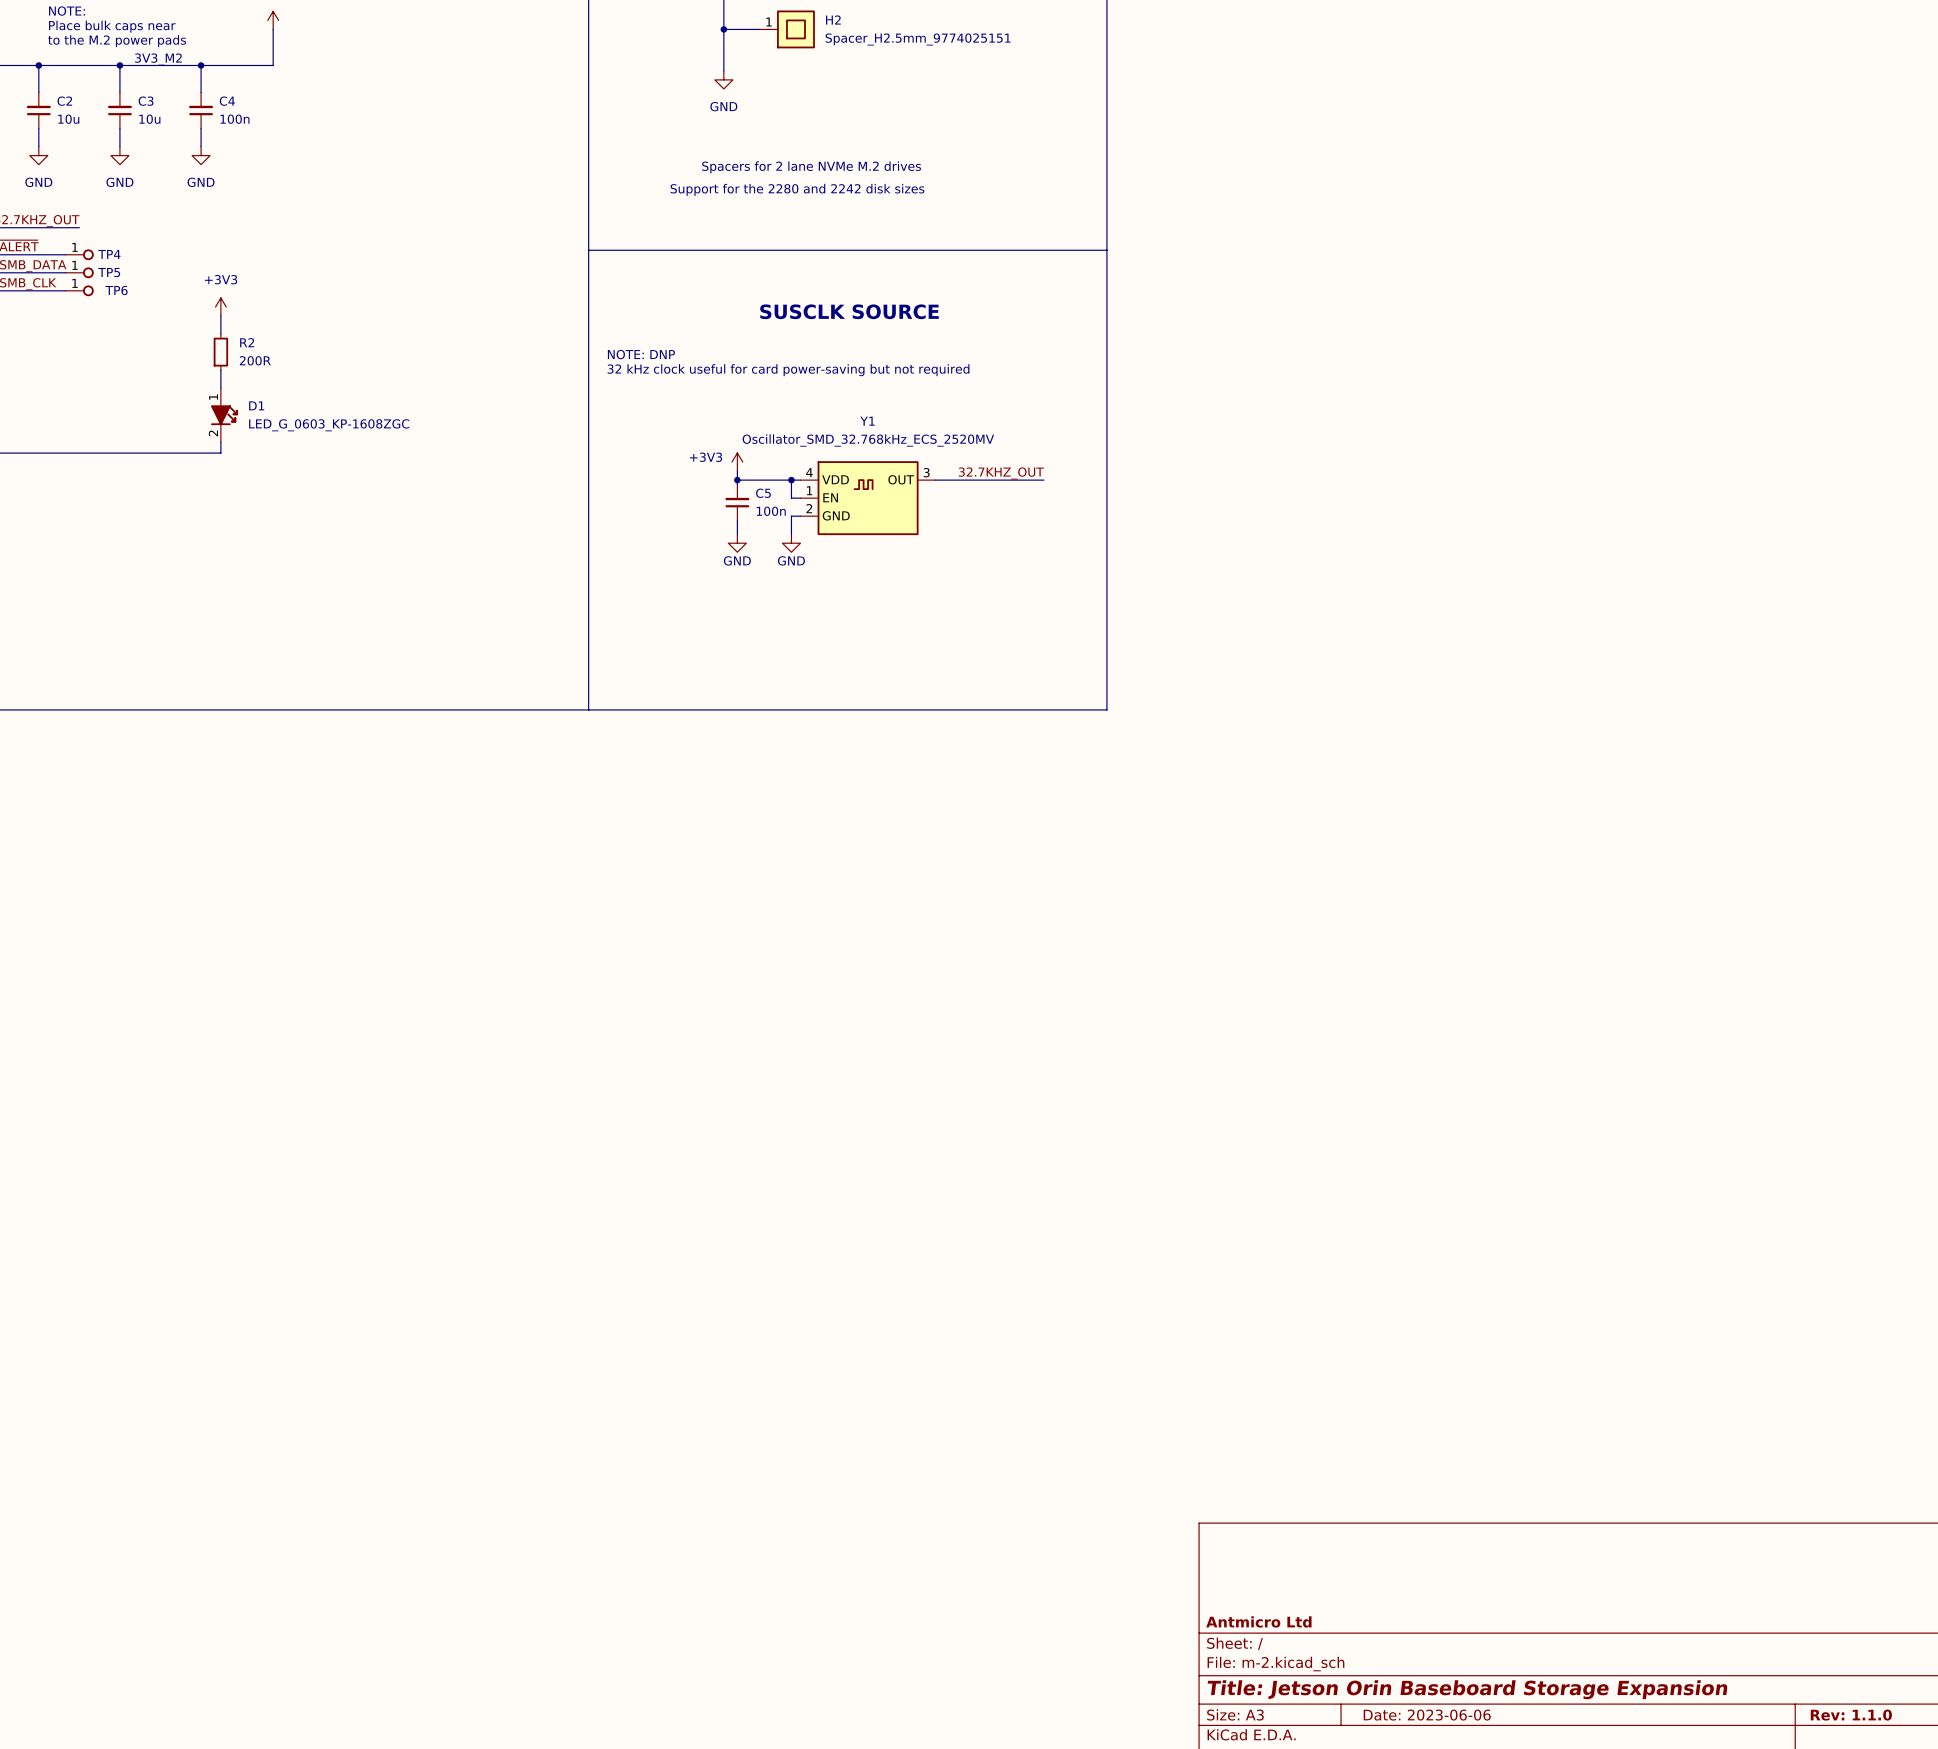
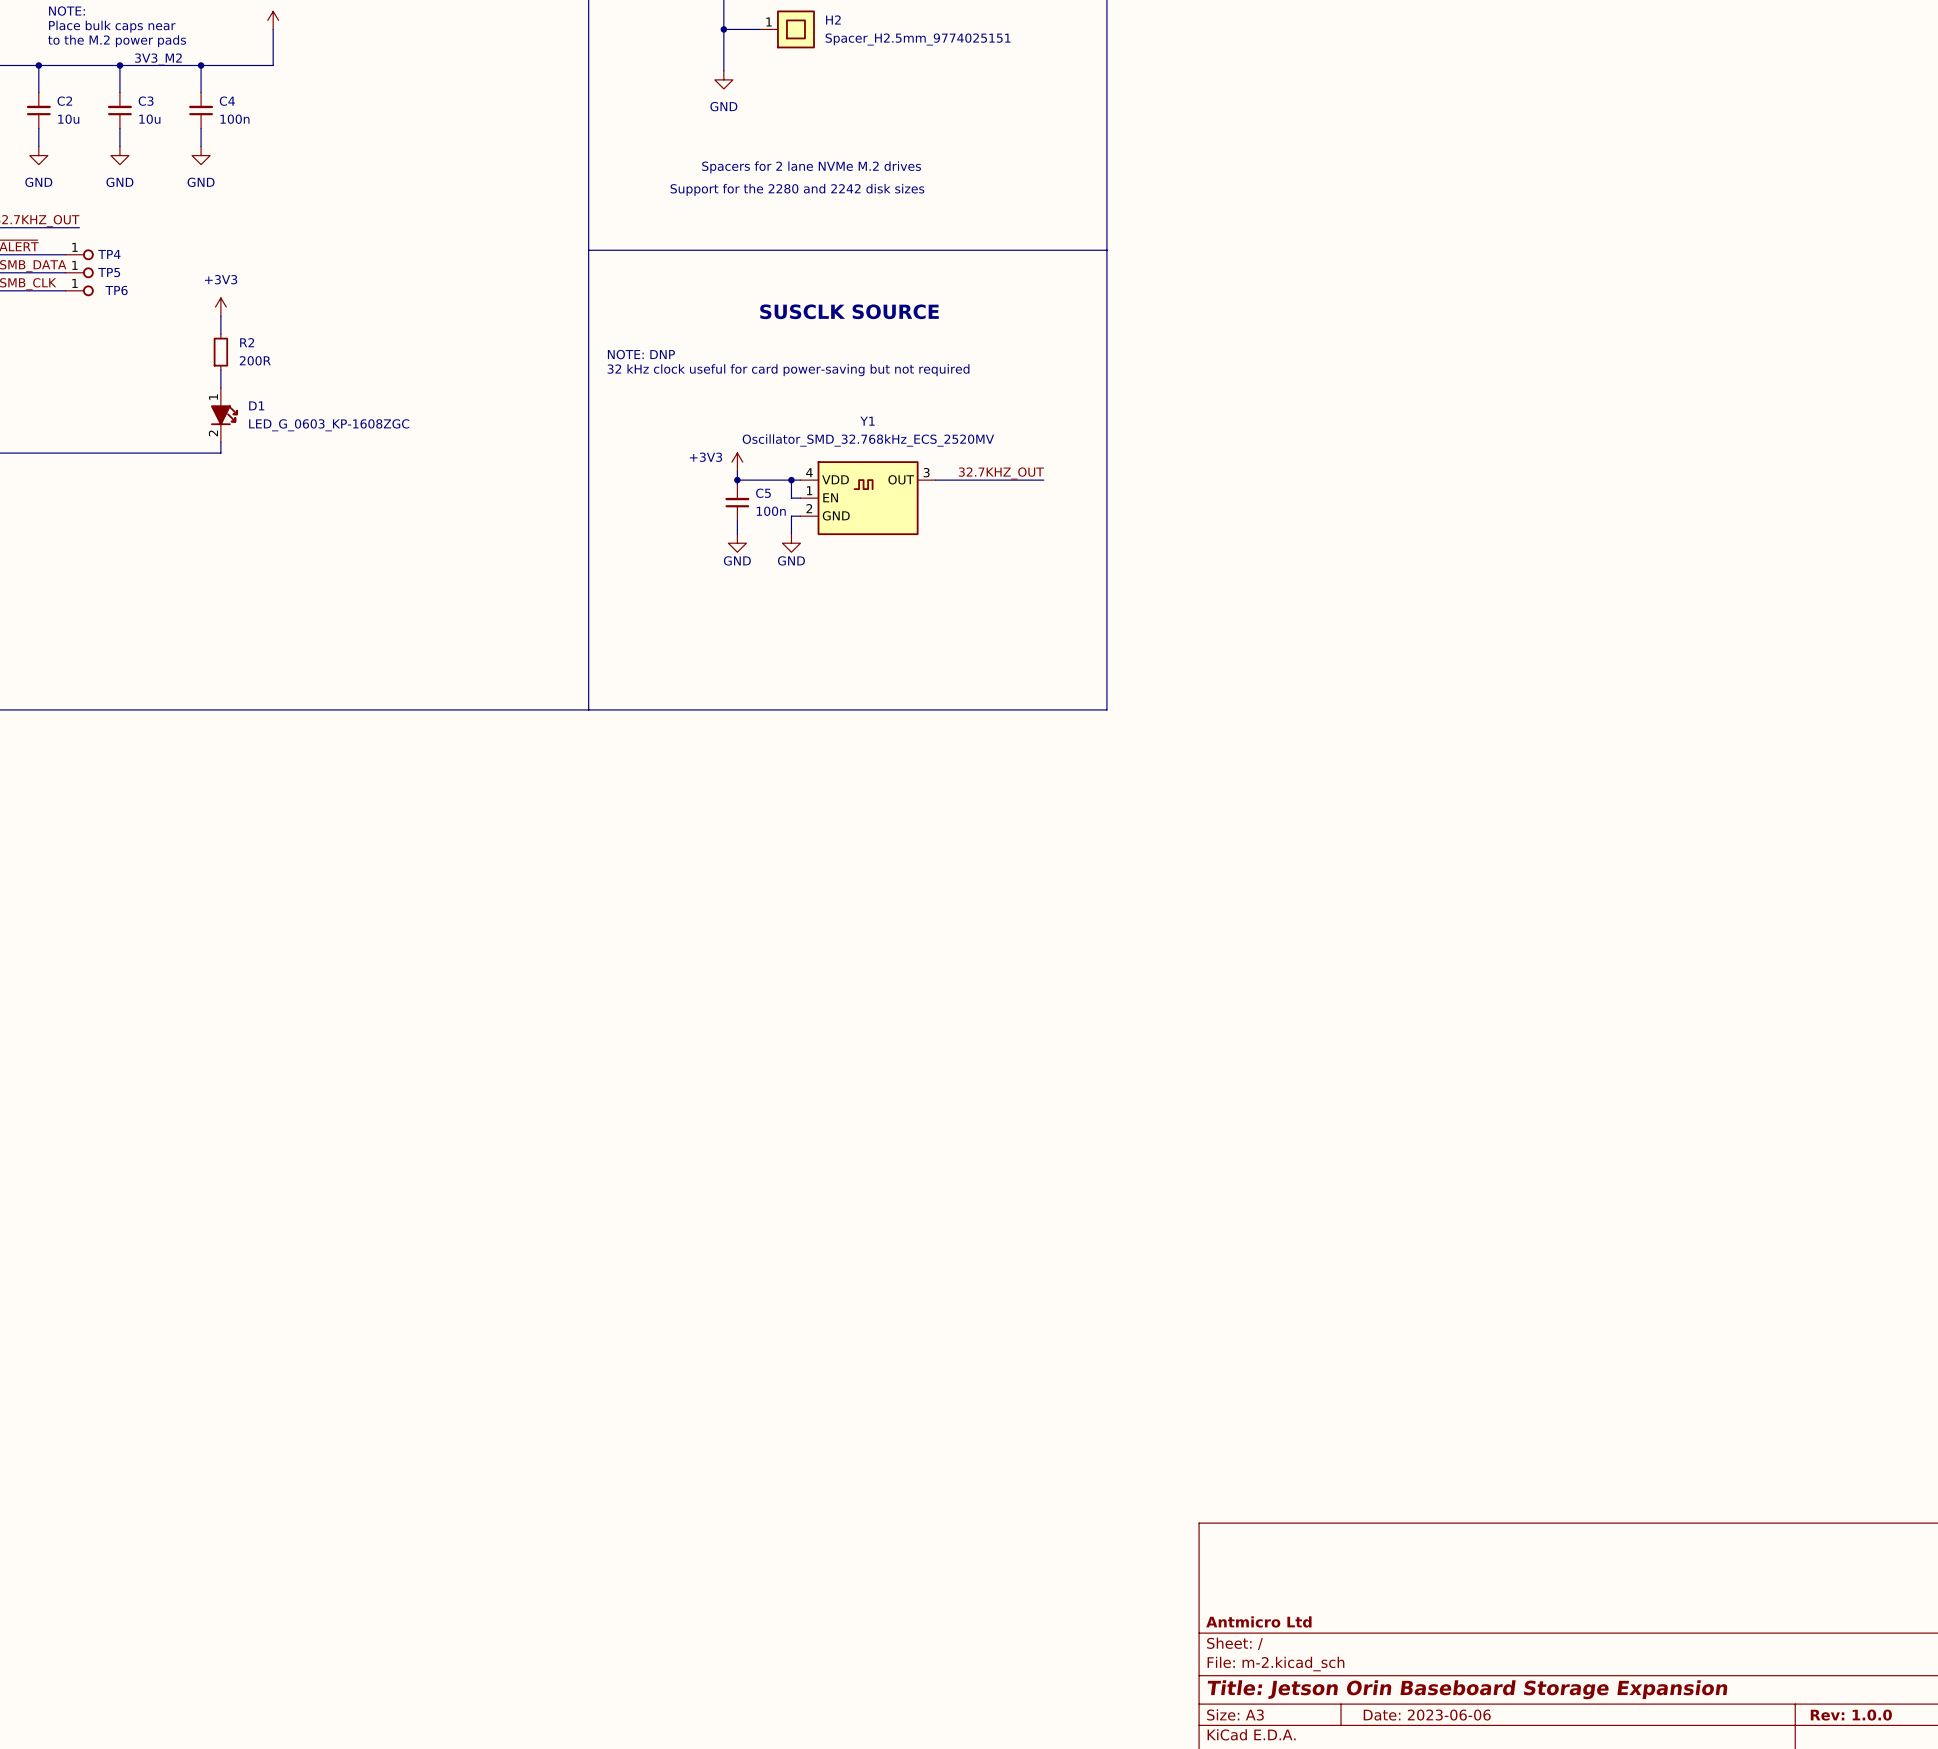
title block: Rev: 1.1.0 (1851, 1715) -> Rev: 1.0.0 (1851, 1715)

